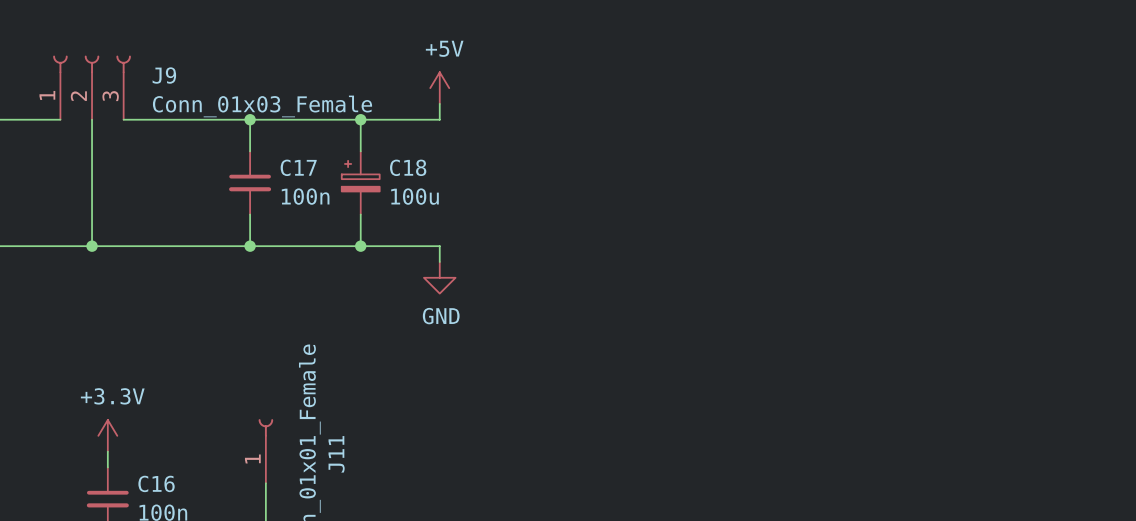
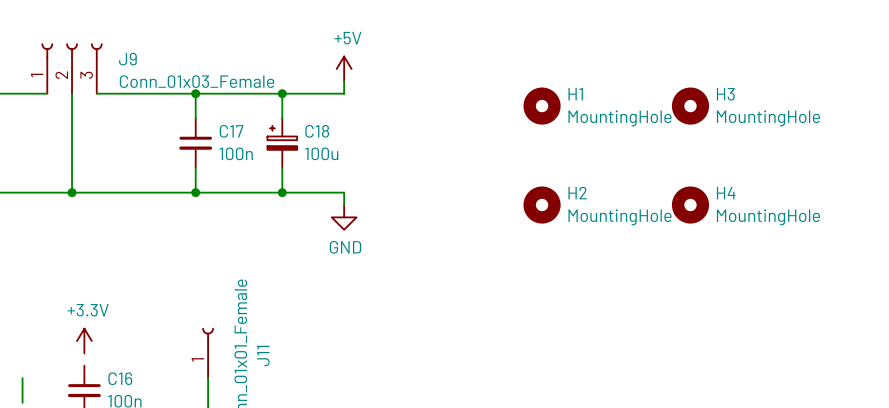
H1: none -> MountingHole (542, 106)
H3: none -> MountingHole (690, 106)
H2: none -> MountingHole (542, 205)
H4: none -> MountingHole (690, 205)
wire: (107, 451) (107, 467) -> none
wire: none -> (22, 378) (22, 402)

